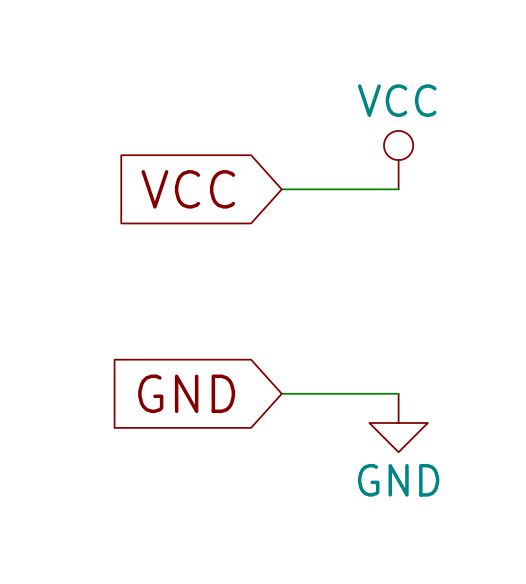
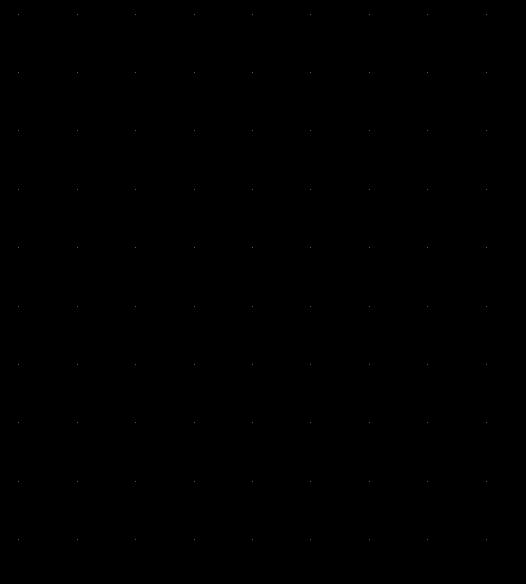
power symbol: VCC (398, 160) -> none
global label: VCC (188, 189) -> none
wire: (281, 189) (398, 189) -> none
global label: GND (186, 393) -> none
wire: (281, 393) (398, 393) -> none
power symbol: GND (398, 422) -> none

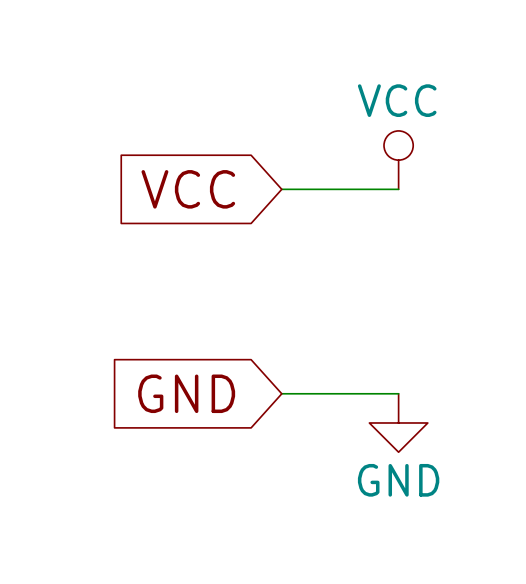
power symbol: none -> VCC (398, 160)
global label: none -> VCC (188, 189)
wire: none -> (281, 189) (398, 189)
global label: none -> GND (186, 393)
wire: none -> (281, 393) (398, 393)
power symbol: none -> GND (398, 422)

